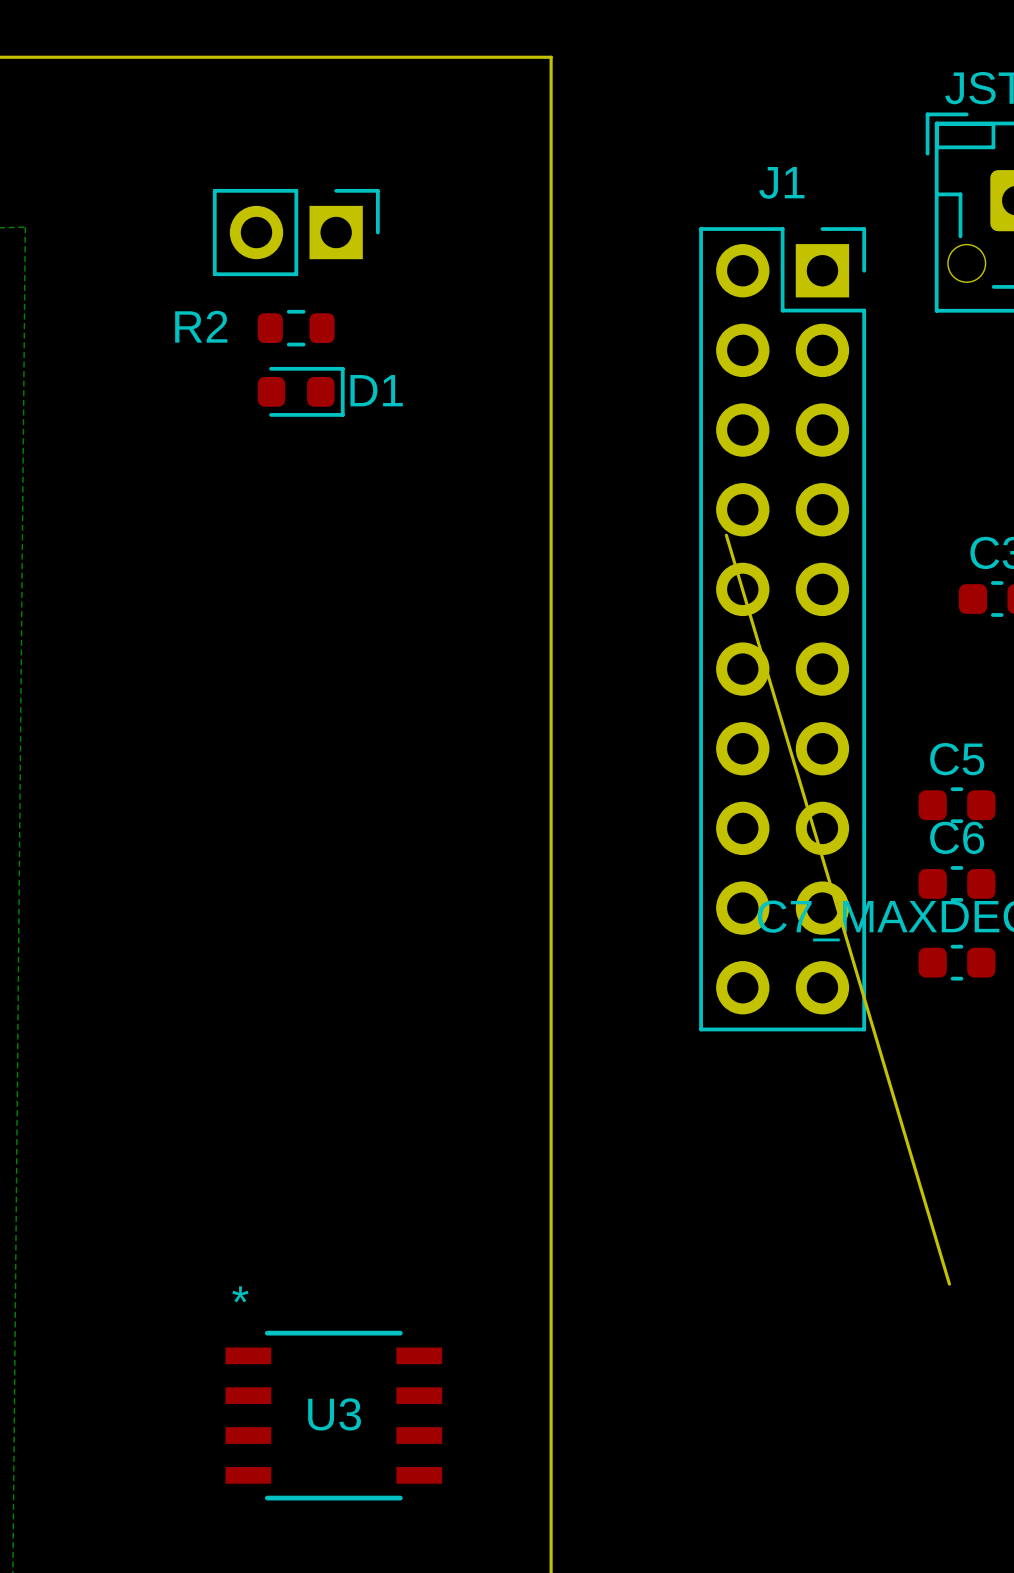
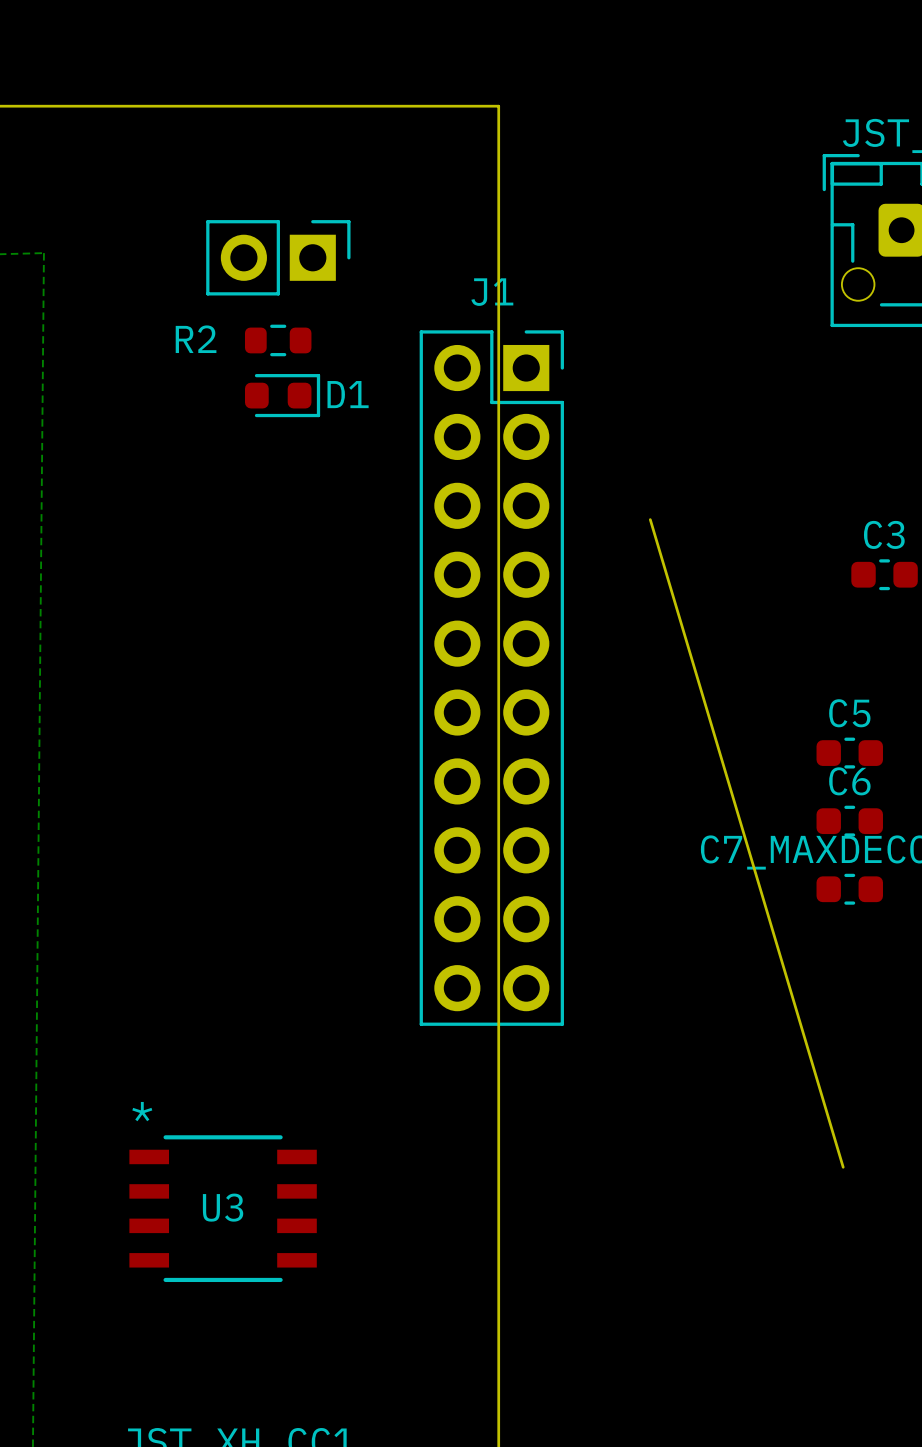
J1 position: (782, 629) -> (491, 678)
U3 position: (333, 1415) -> (223, 1208)

